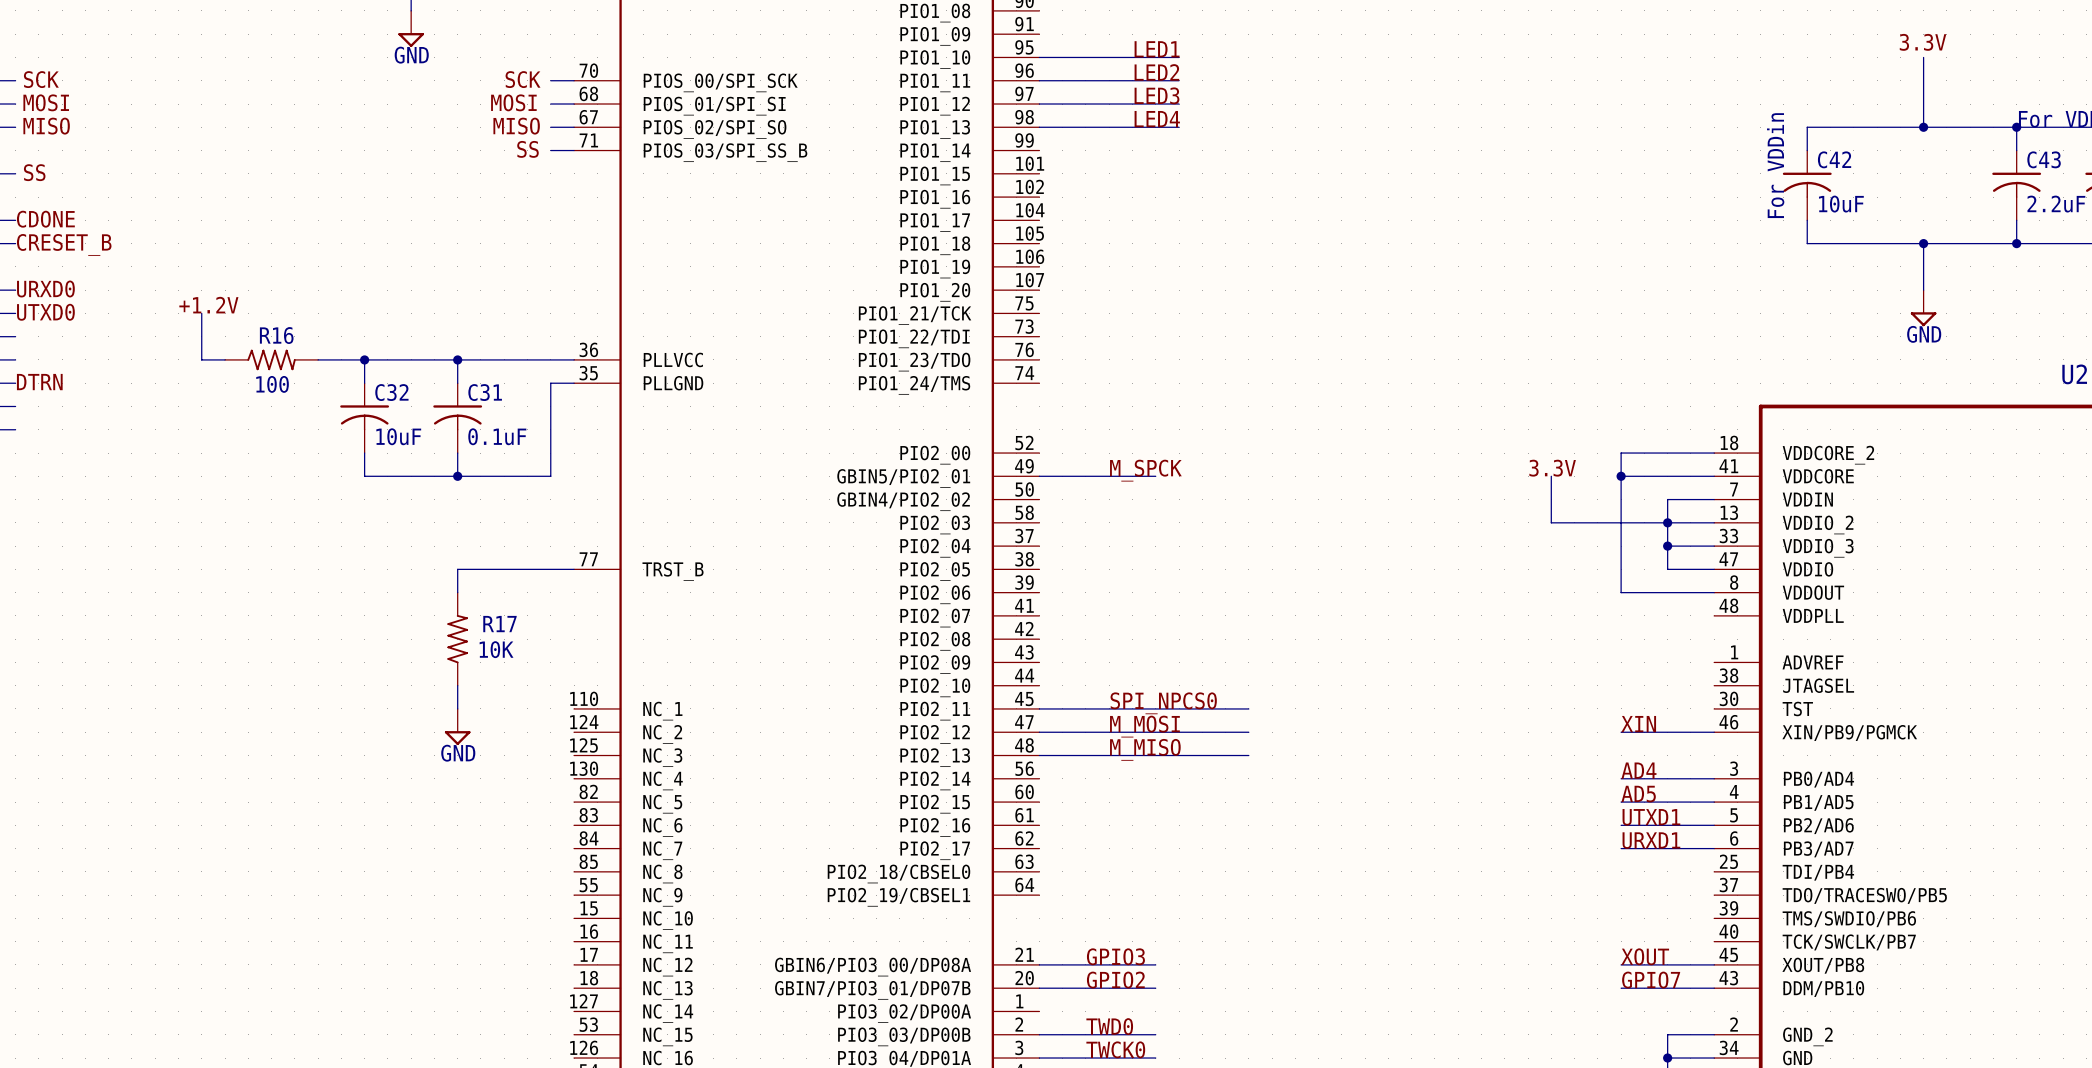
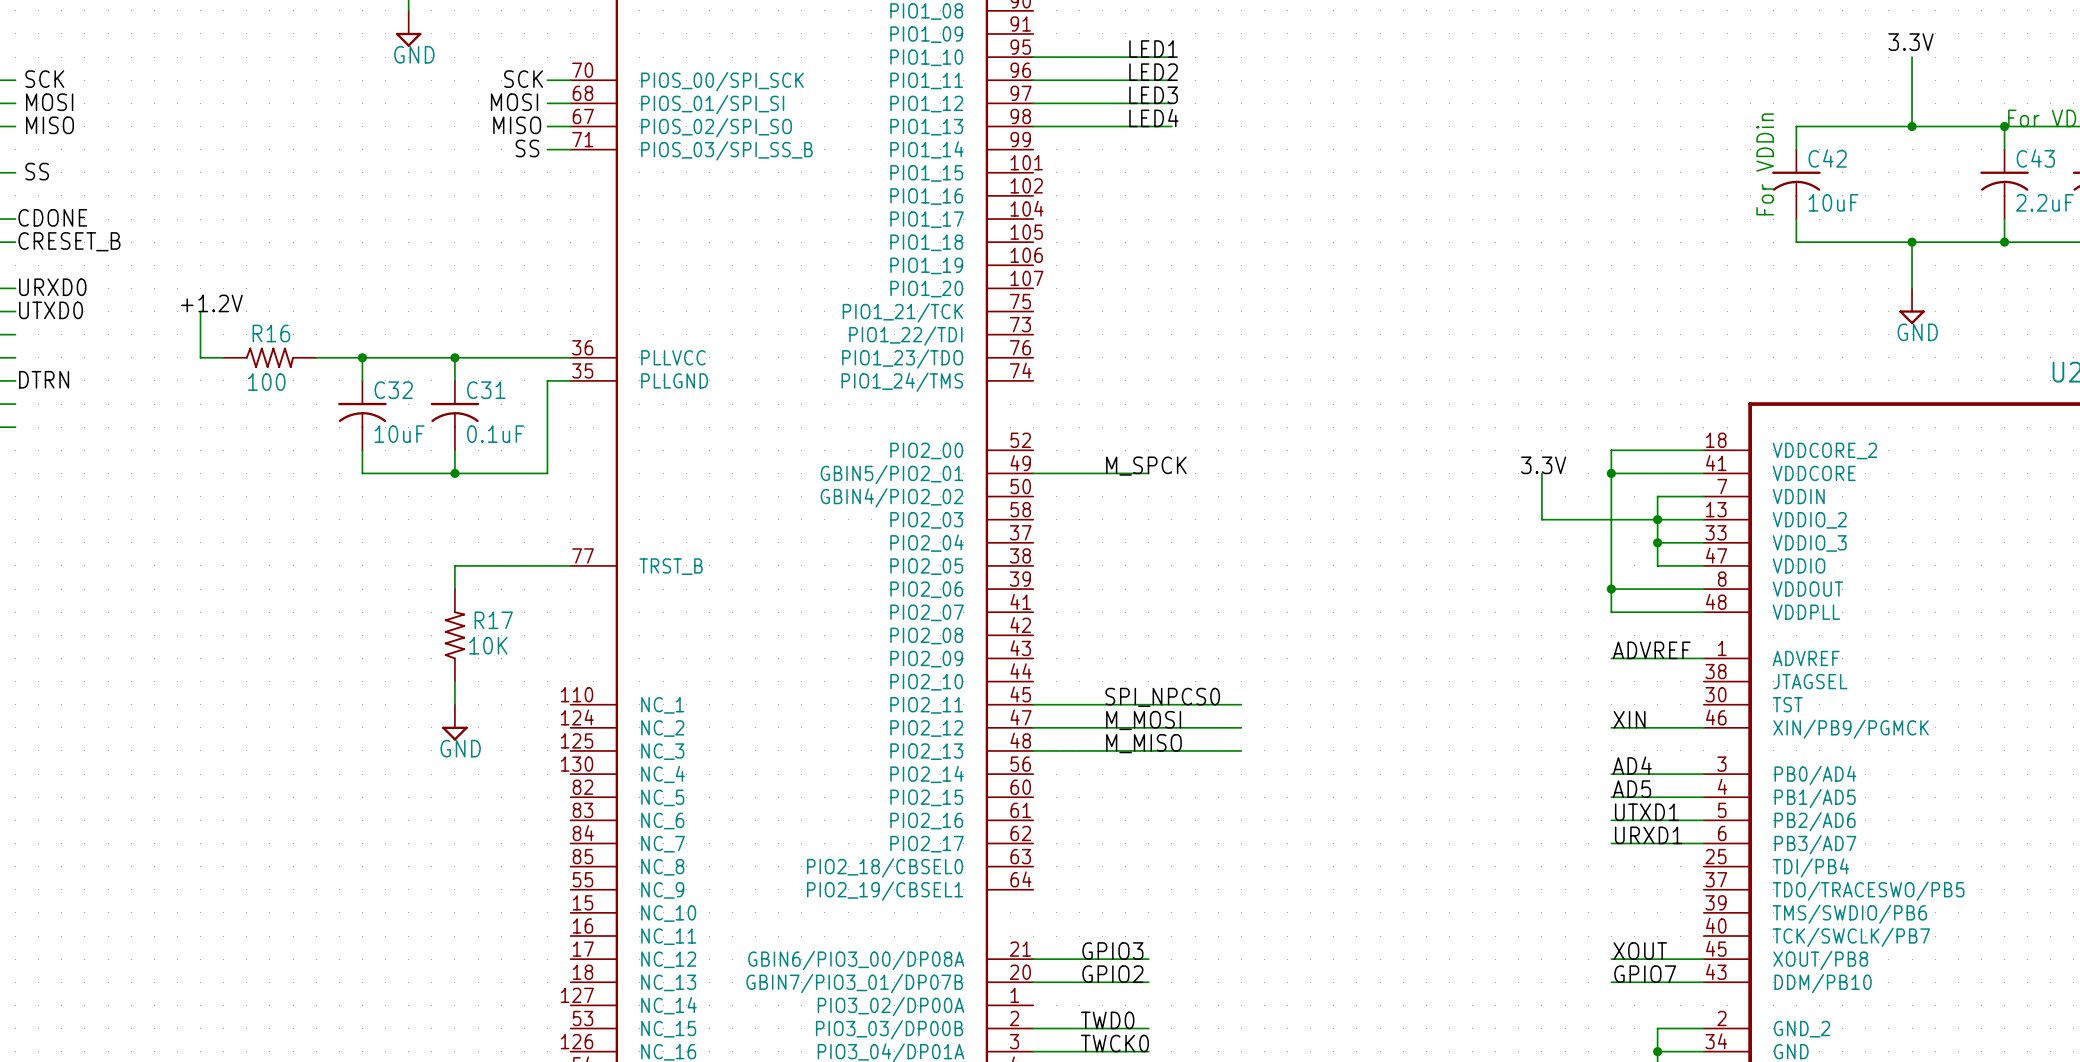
wire: none -> (1611, 589) (1611, 612) (1703, 612)
junction: none -> (1611, 589)
label: none -> ADVREF (1651, 650)
wire: none -> (1611, 658) (1703, 658)

